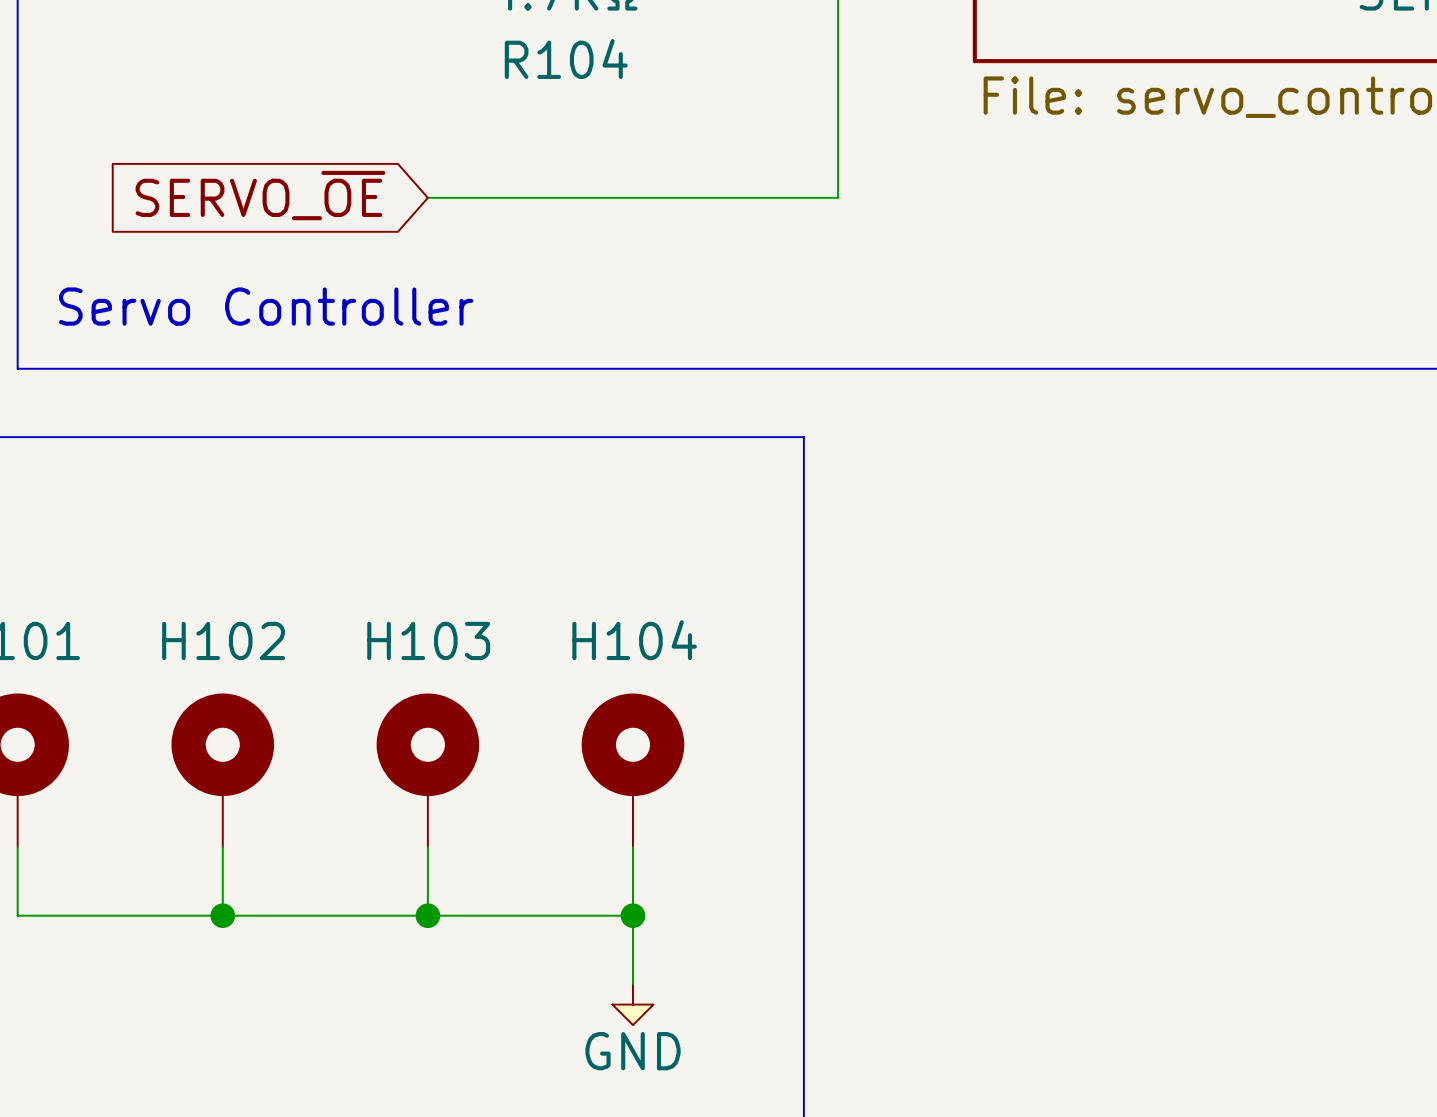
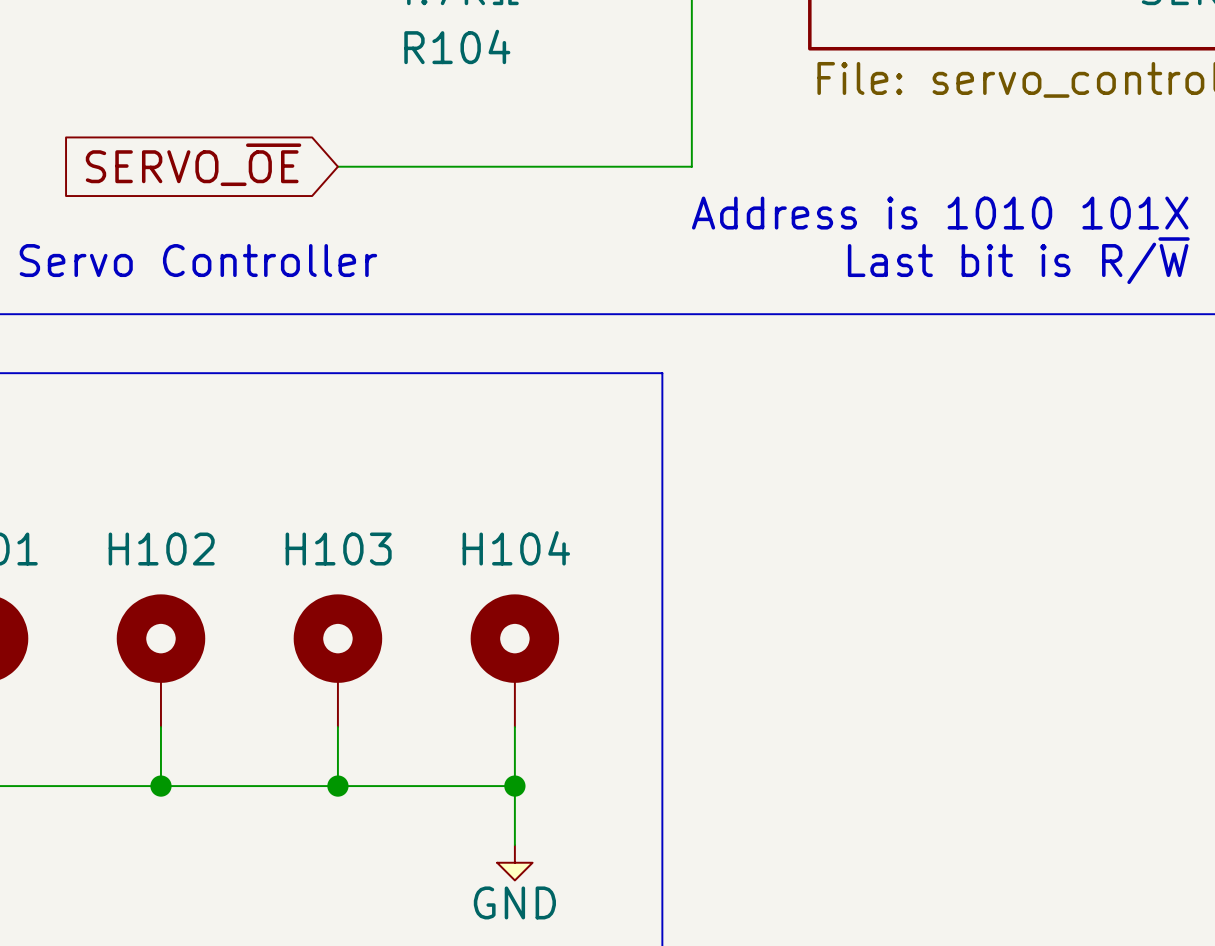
text: none -> Address is 1010 101X (940, 213)
text: none -> Last bit is R/~{W} (1018, 260)

